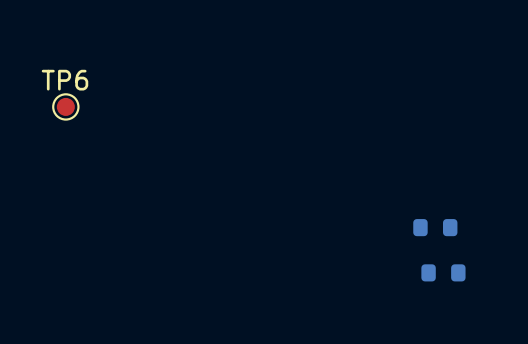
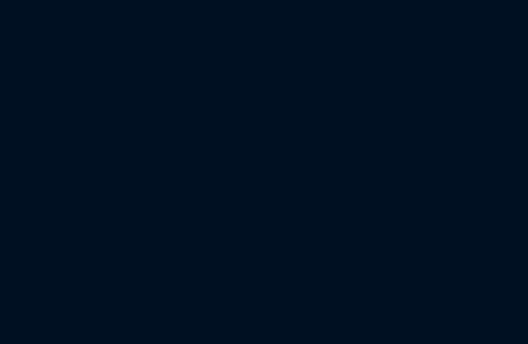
TP6: (65, 106) -> none
part: (435, 227) -> none
part: (443, 272) -> none

